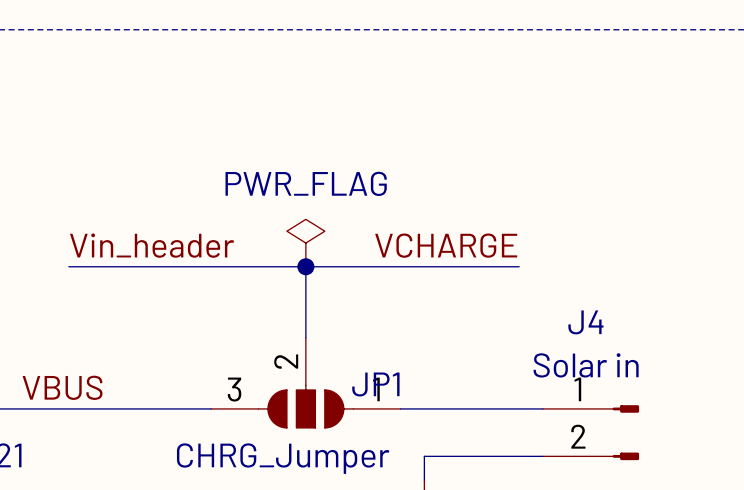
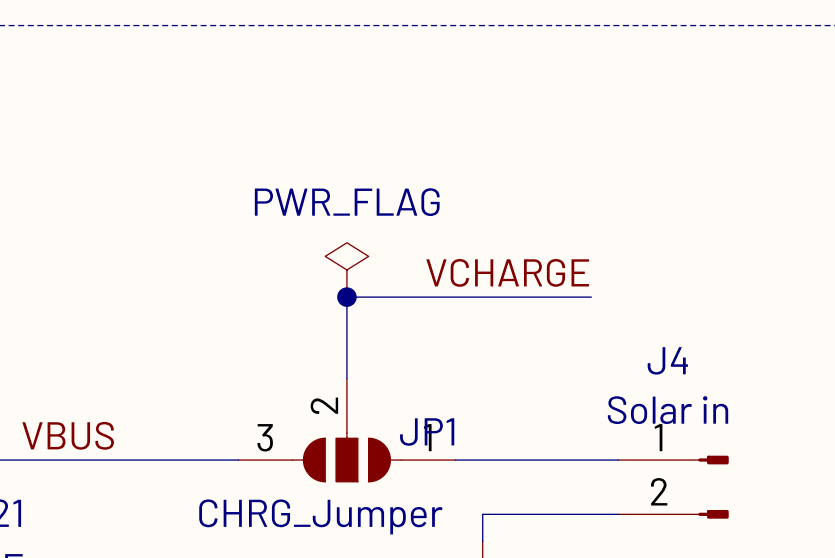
label: Vin_header (152, 245) -> none
wire: (68, 266) (305, 266) -> none

